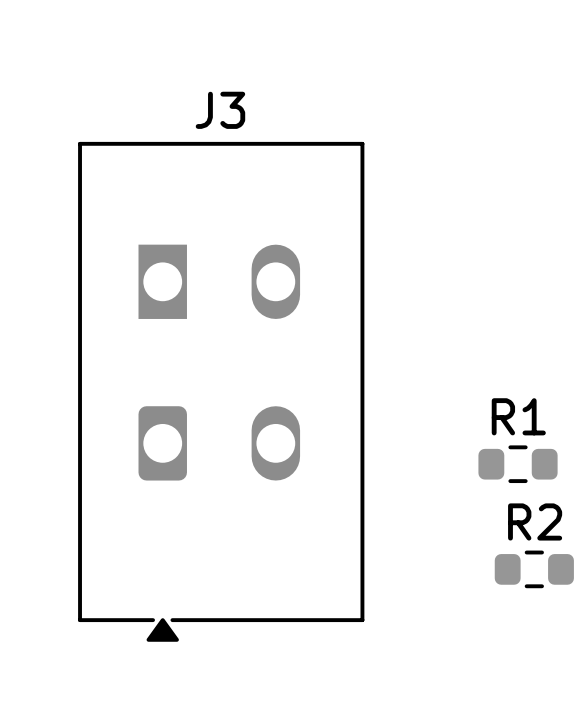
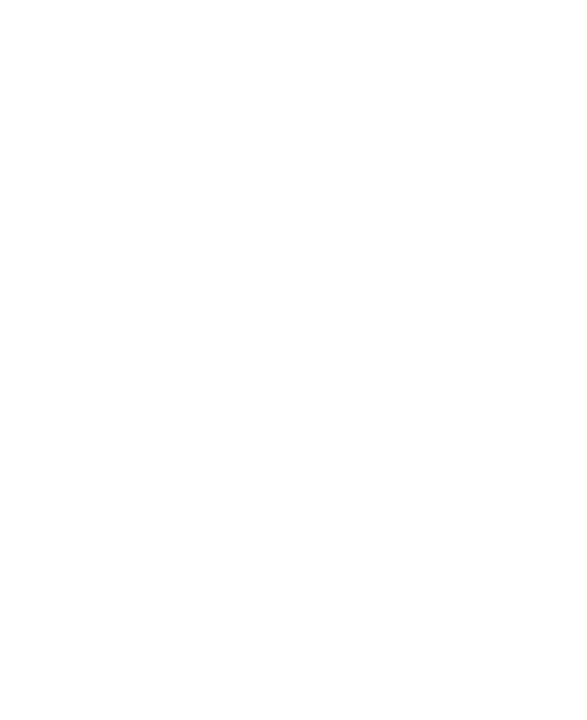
J3: (221, 391) -> none
R1: (518, 464) -> none
R2: (534, 569) -> none

